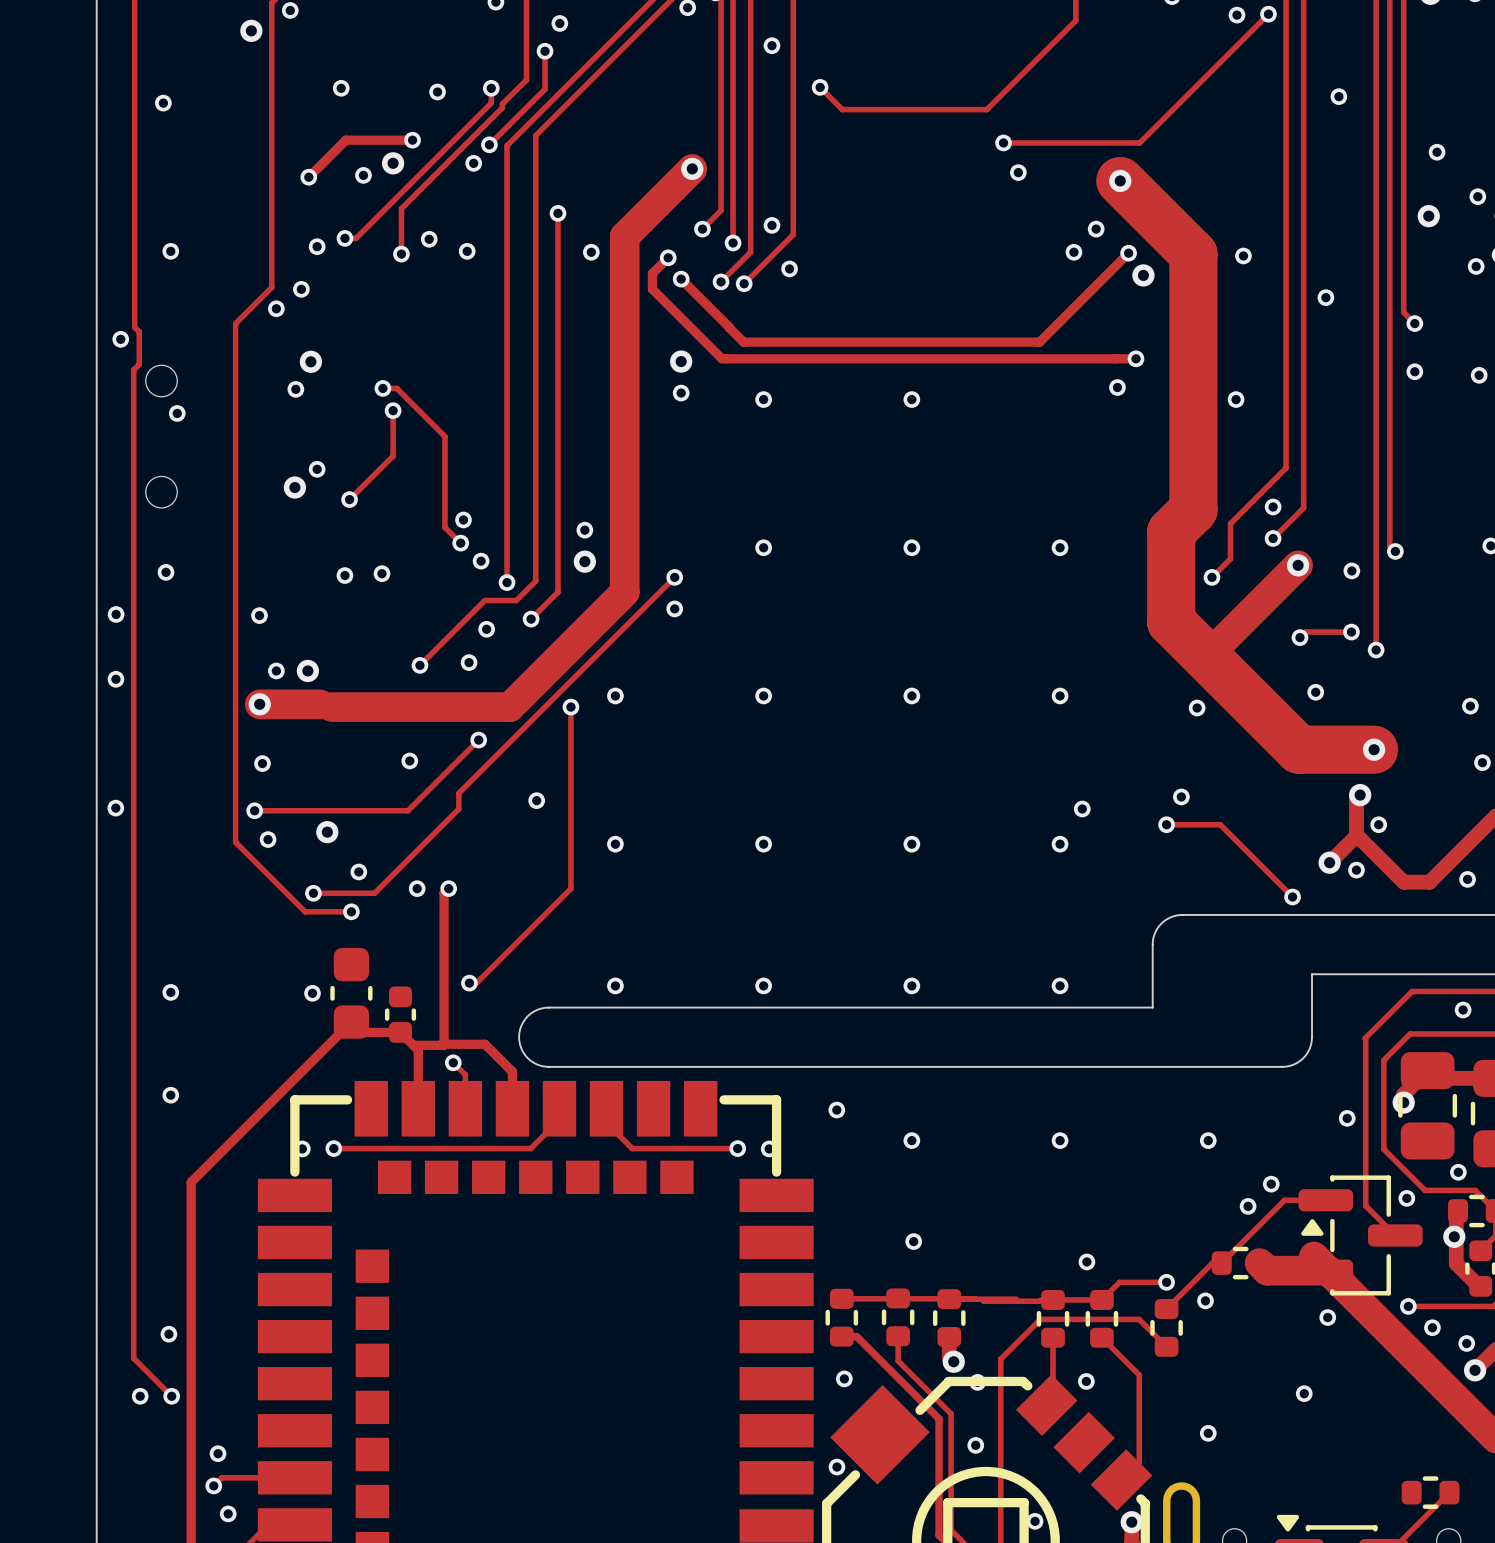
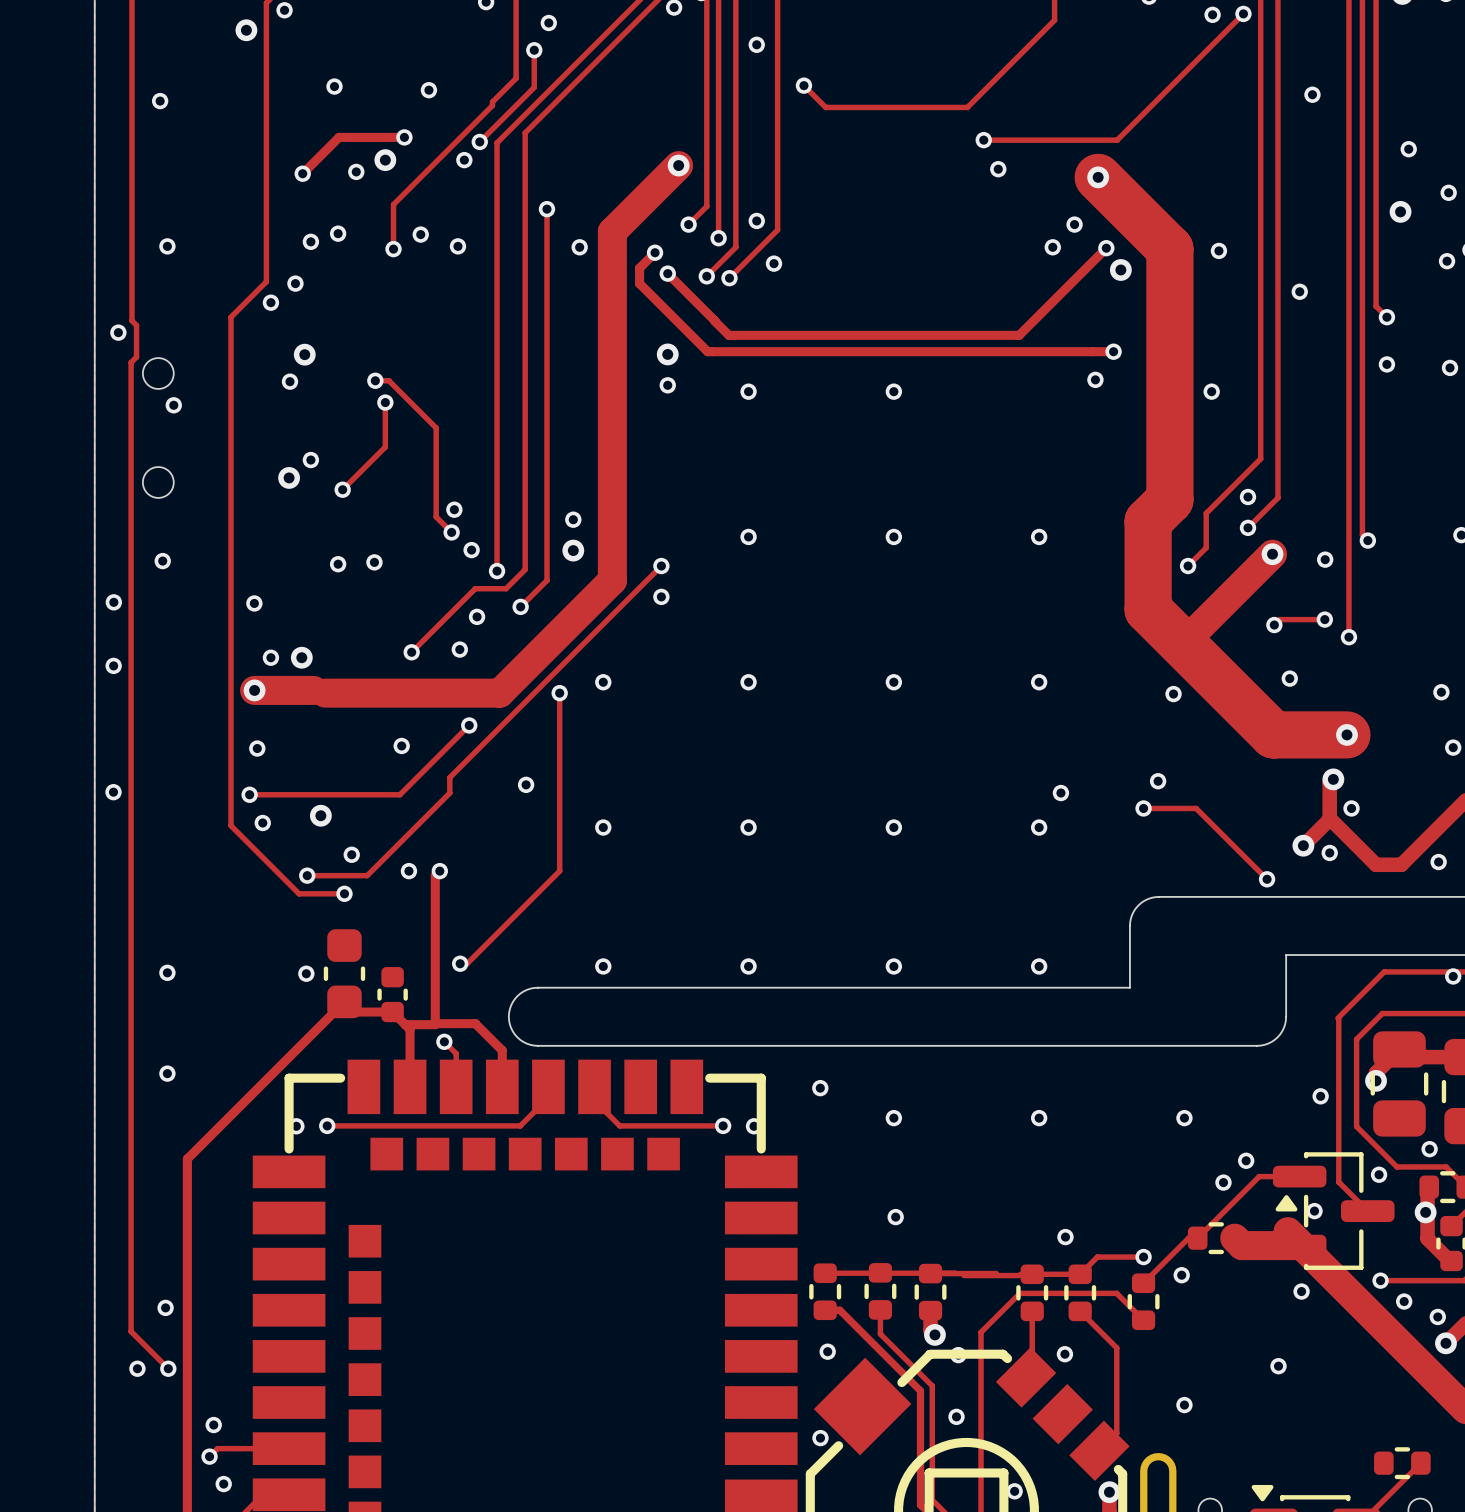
track: (491, 88) (491, 103) (356, 238) (344, 238) -> none
via: (491, 88) -> none
via position: (1463, 1010) -> (1453, 976)
via: none -> (1314, 1211)

